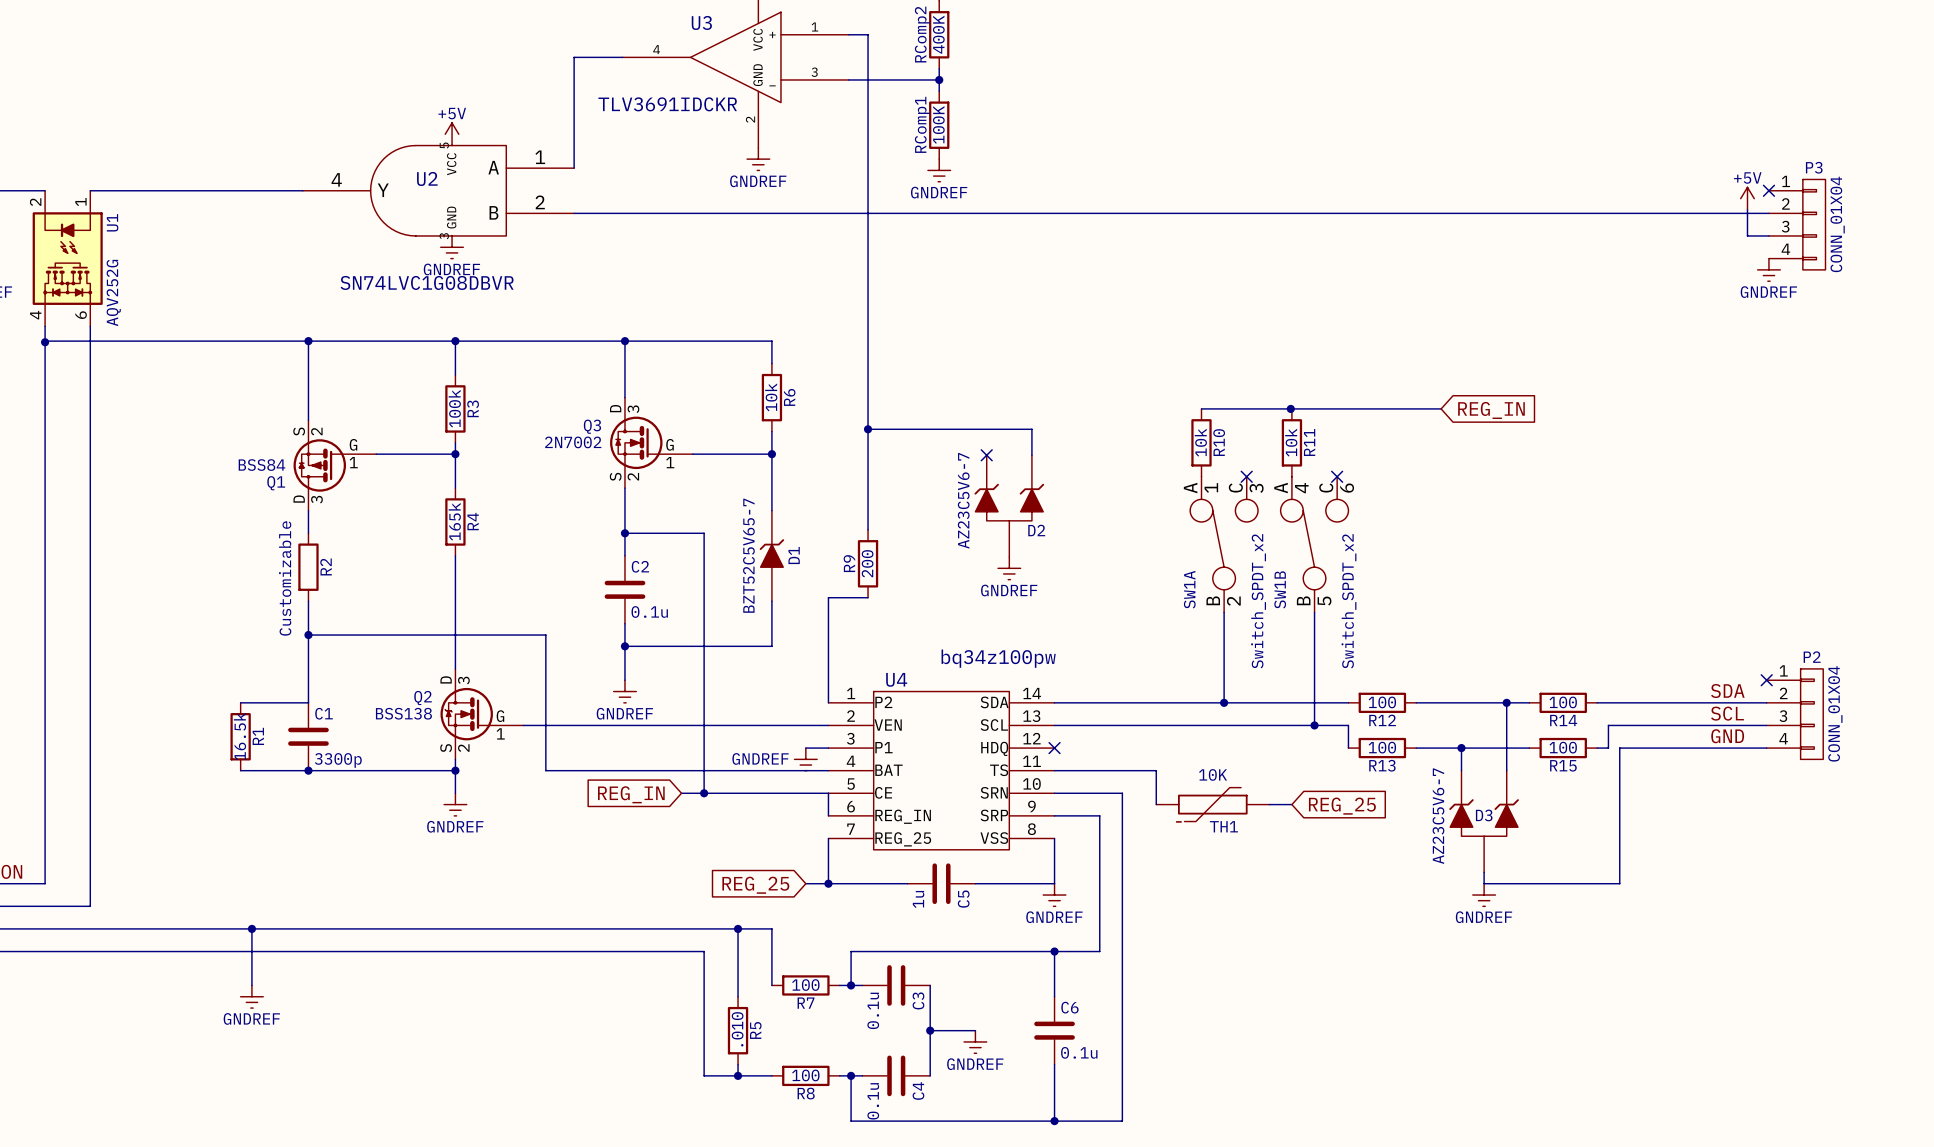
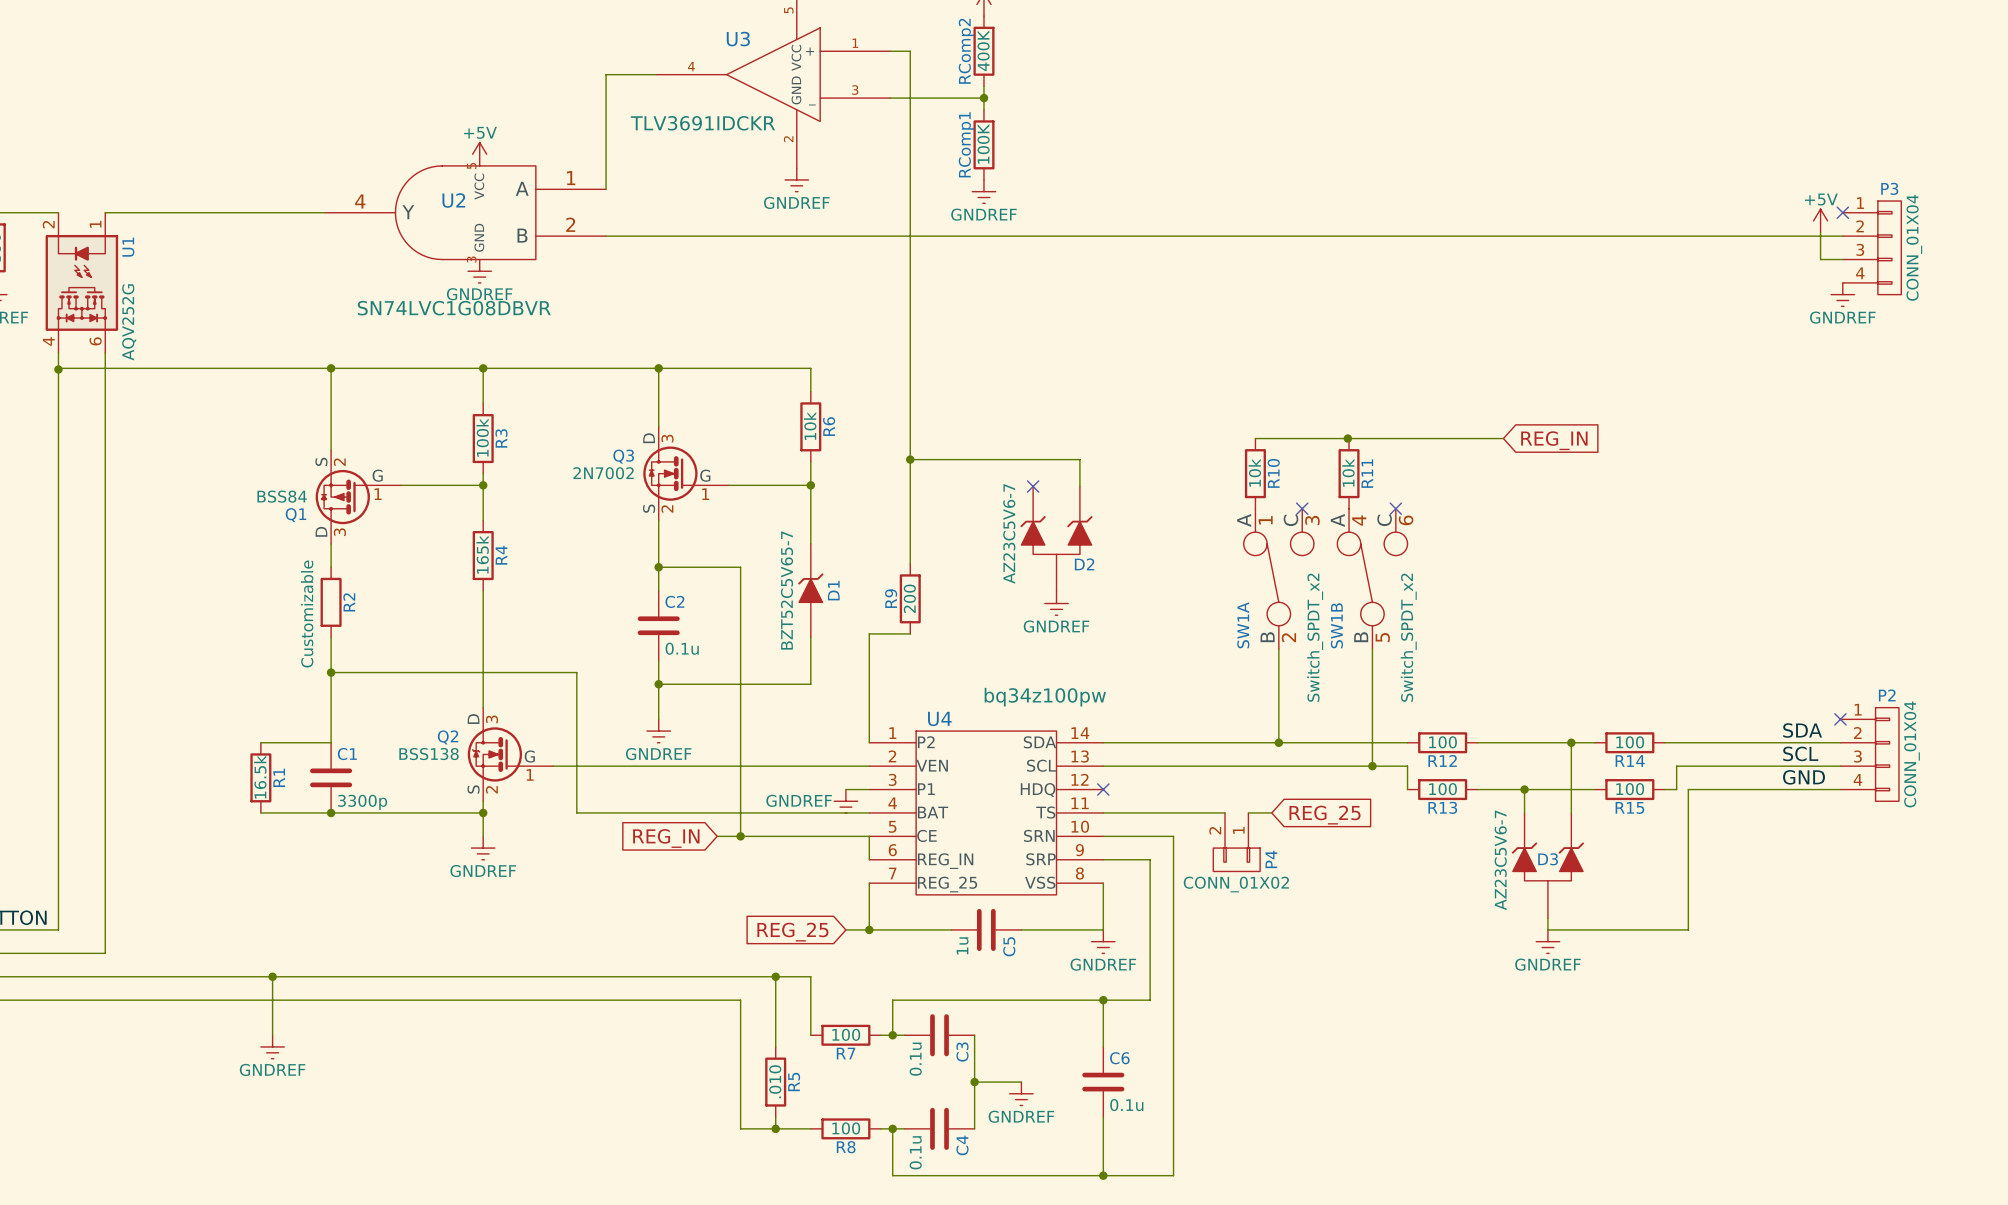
wire: (1156, 770) (1156, 804) -> (1208, 812) (1225, 812)
P4: none -> CONN_01X02 (1236, 842)
TH1: 10K (1212, 804) -> none
wire: (1269, 804) (1291, 804) -> (1248, 812) (1271, 812)
global label position: REG_25 (1342, 806) -> REG_25 (1325, 815)

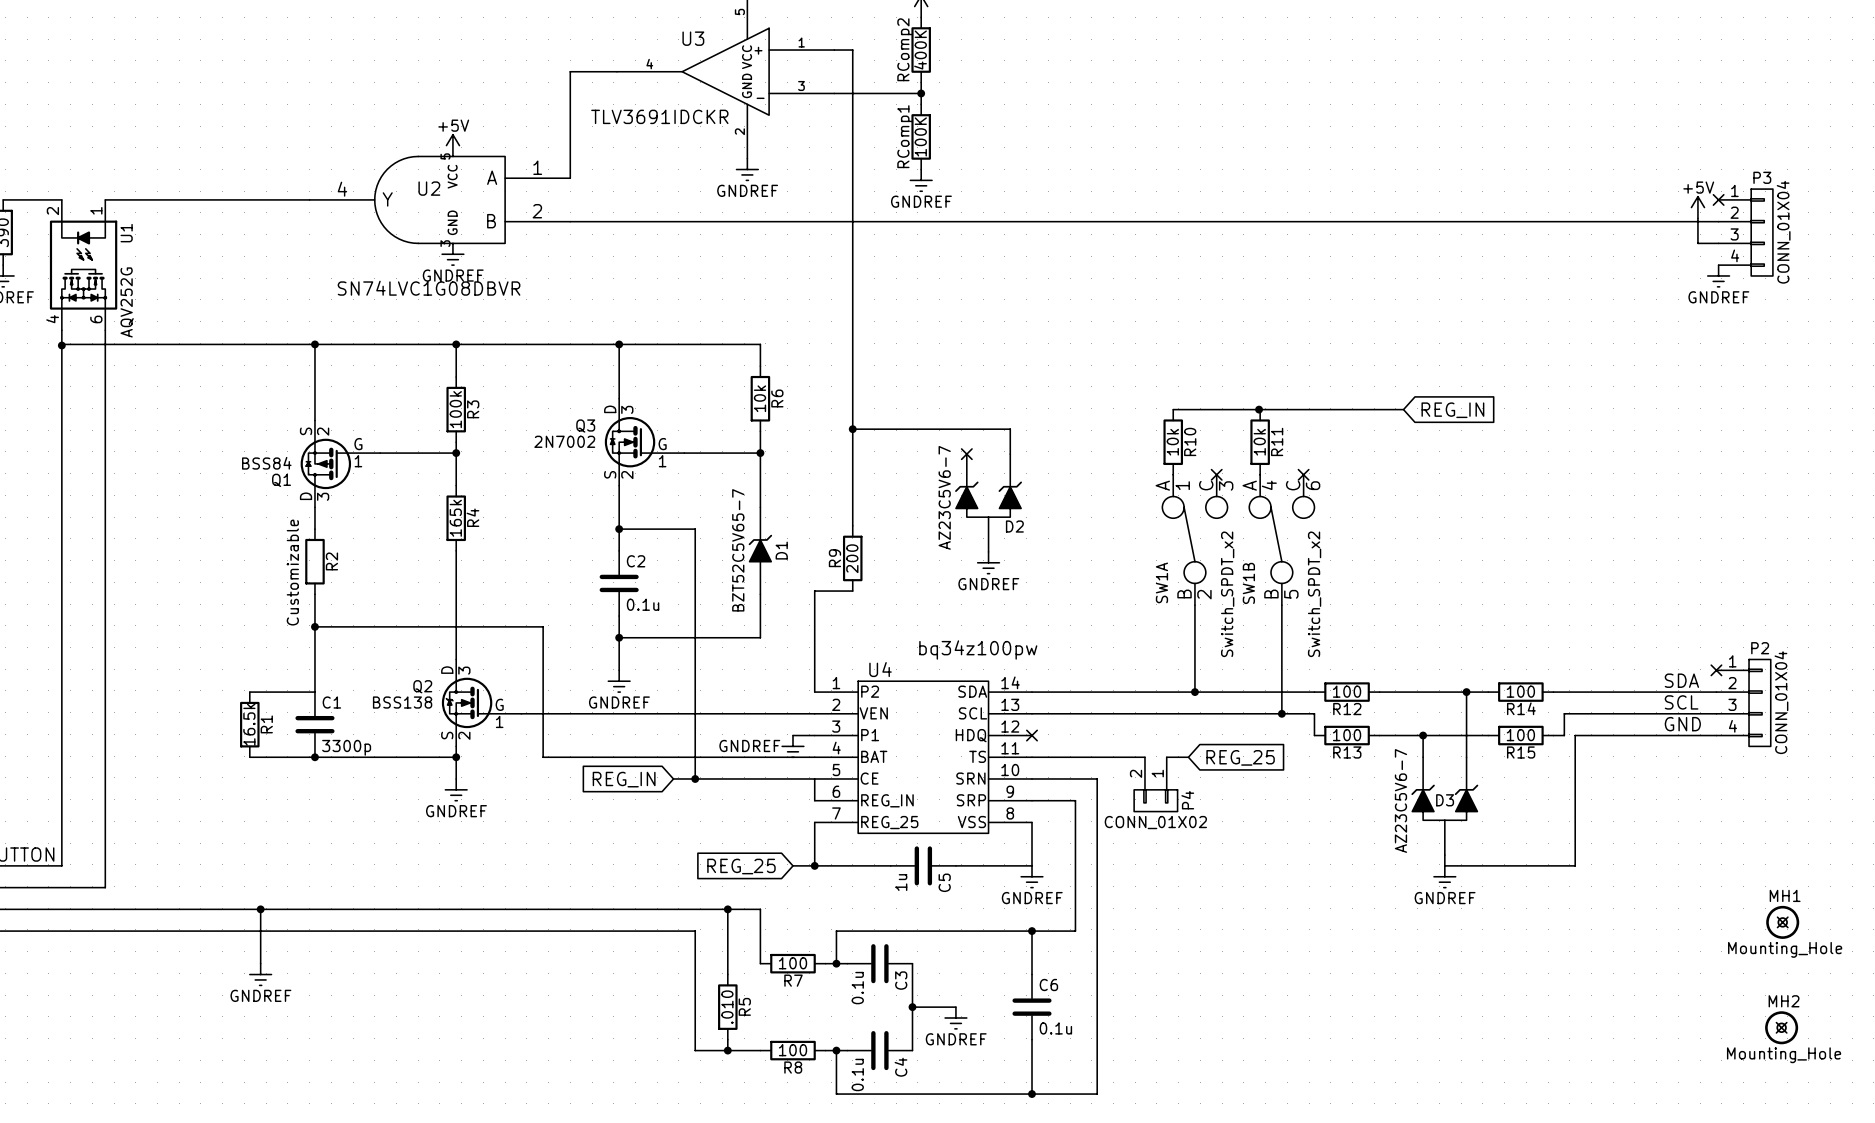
MH1: none -> Mounting_Hole (1782, 922)
no-connect mark: none -> (1782, 922)
MH2: none -> Mounting_Hole (1781, 1027)
no-connect mark: none -> (1781, 1027)

